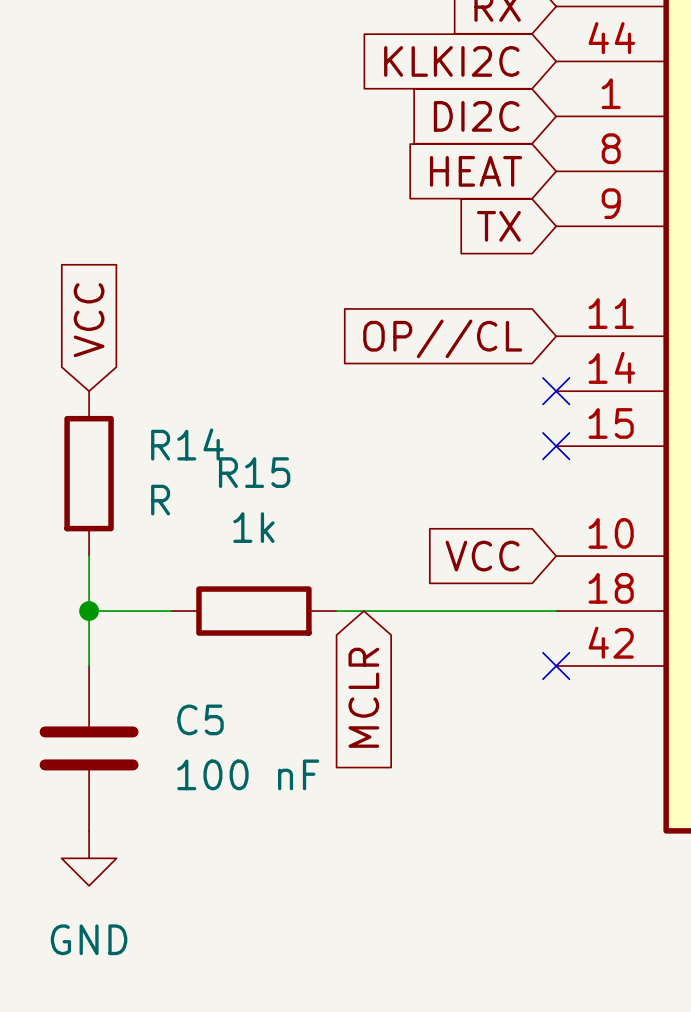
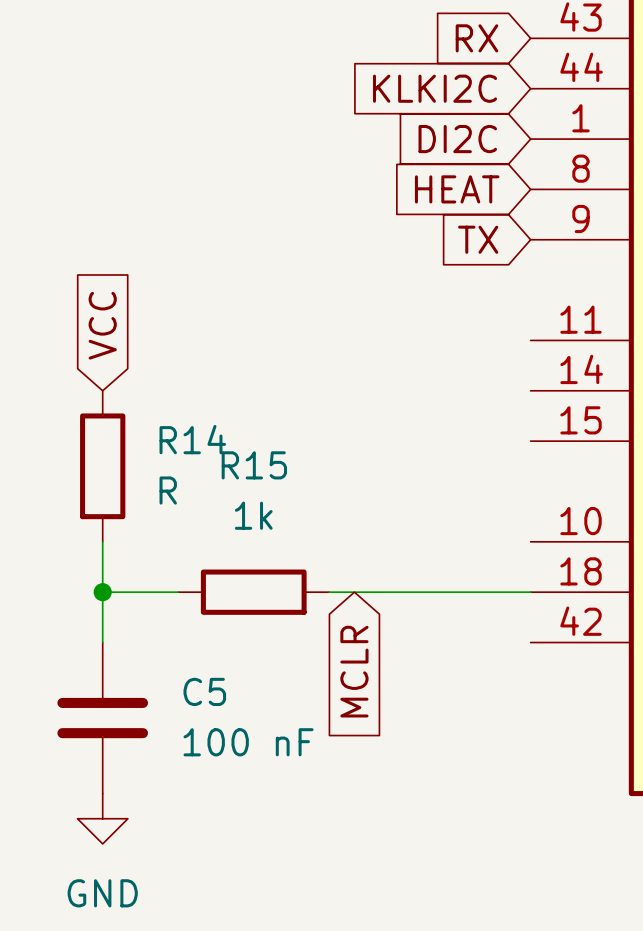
global label: OP//CL (442, 338) -> none
no-connect mark: (556, 391) -> none
no-connect mark: (556, 446) -> none
global label: VCC (482, 556) -> none
no-connect mark: (556, 665) -> none

